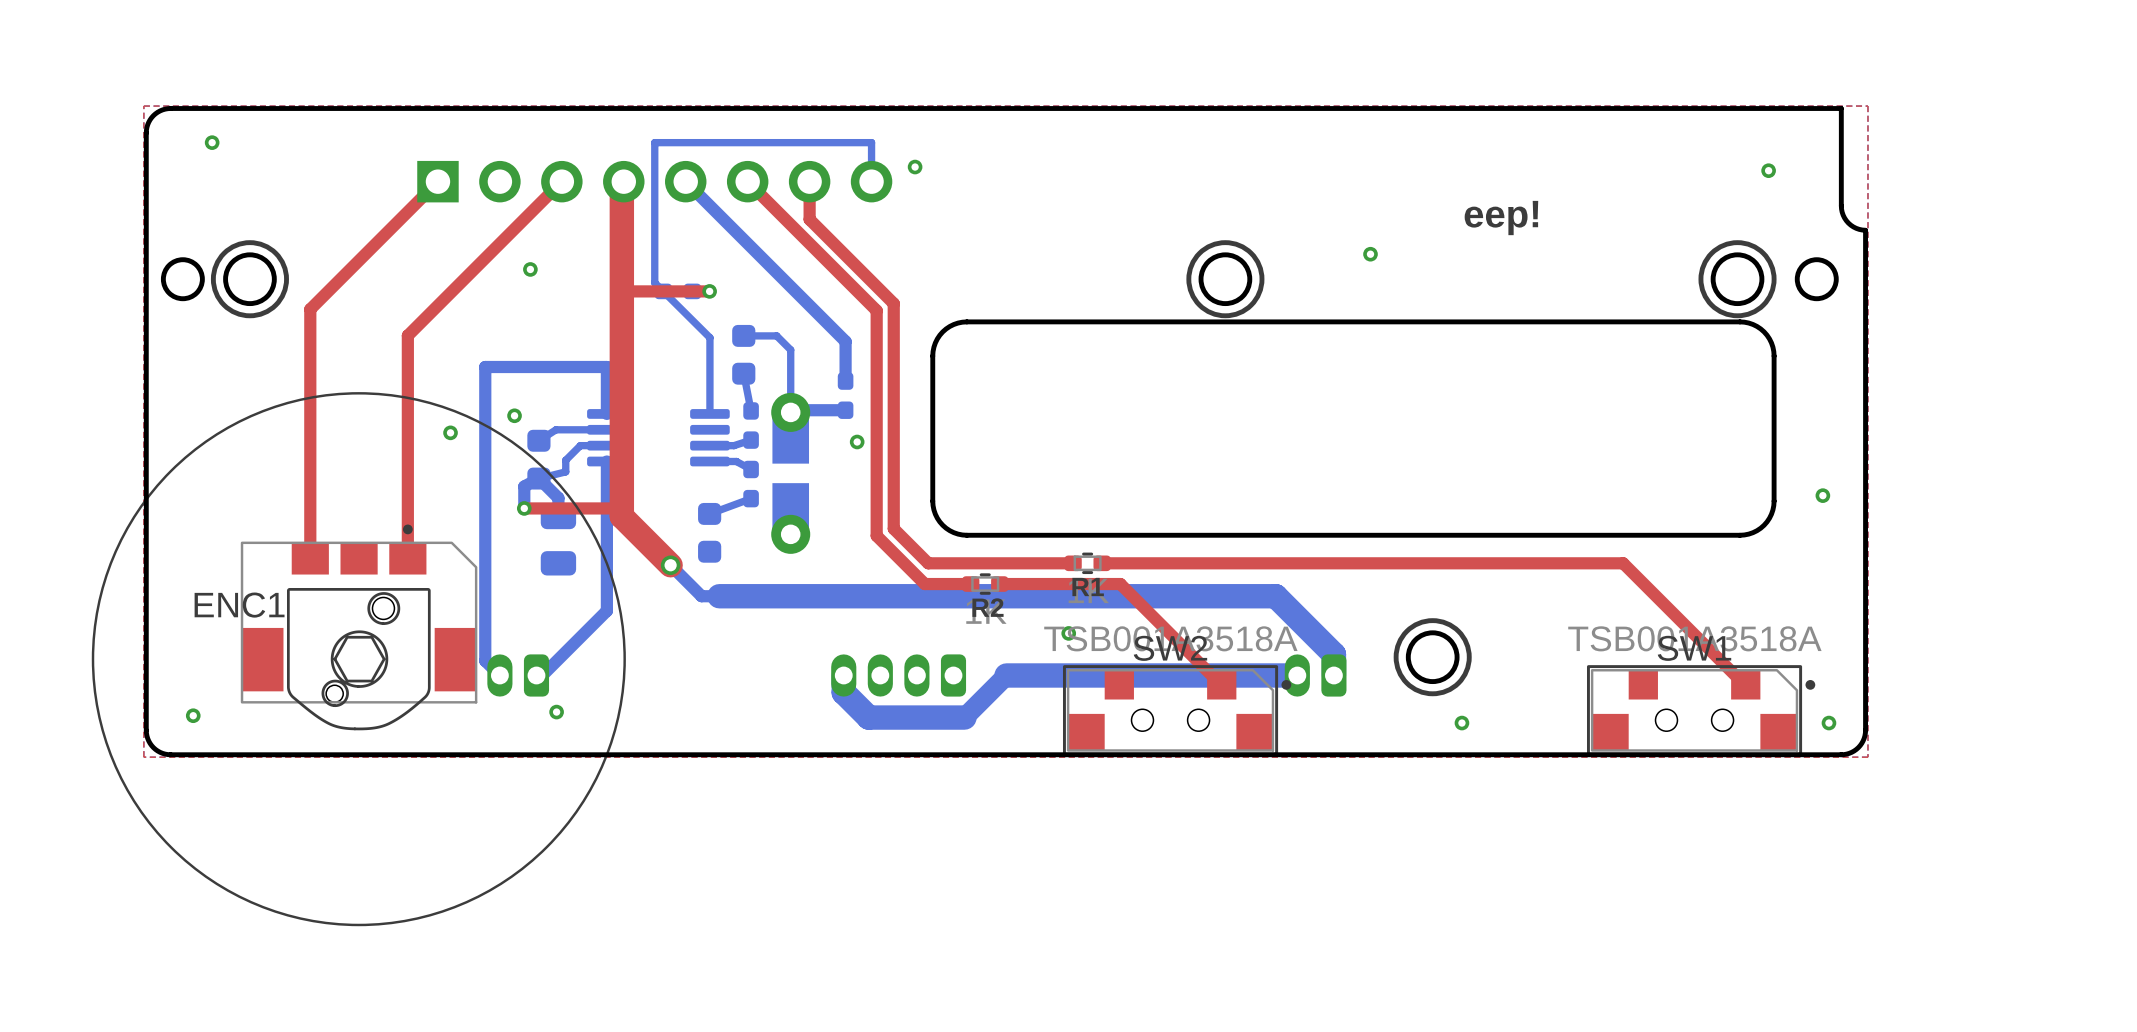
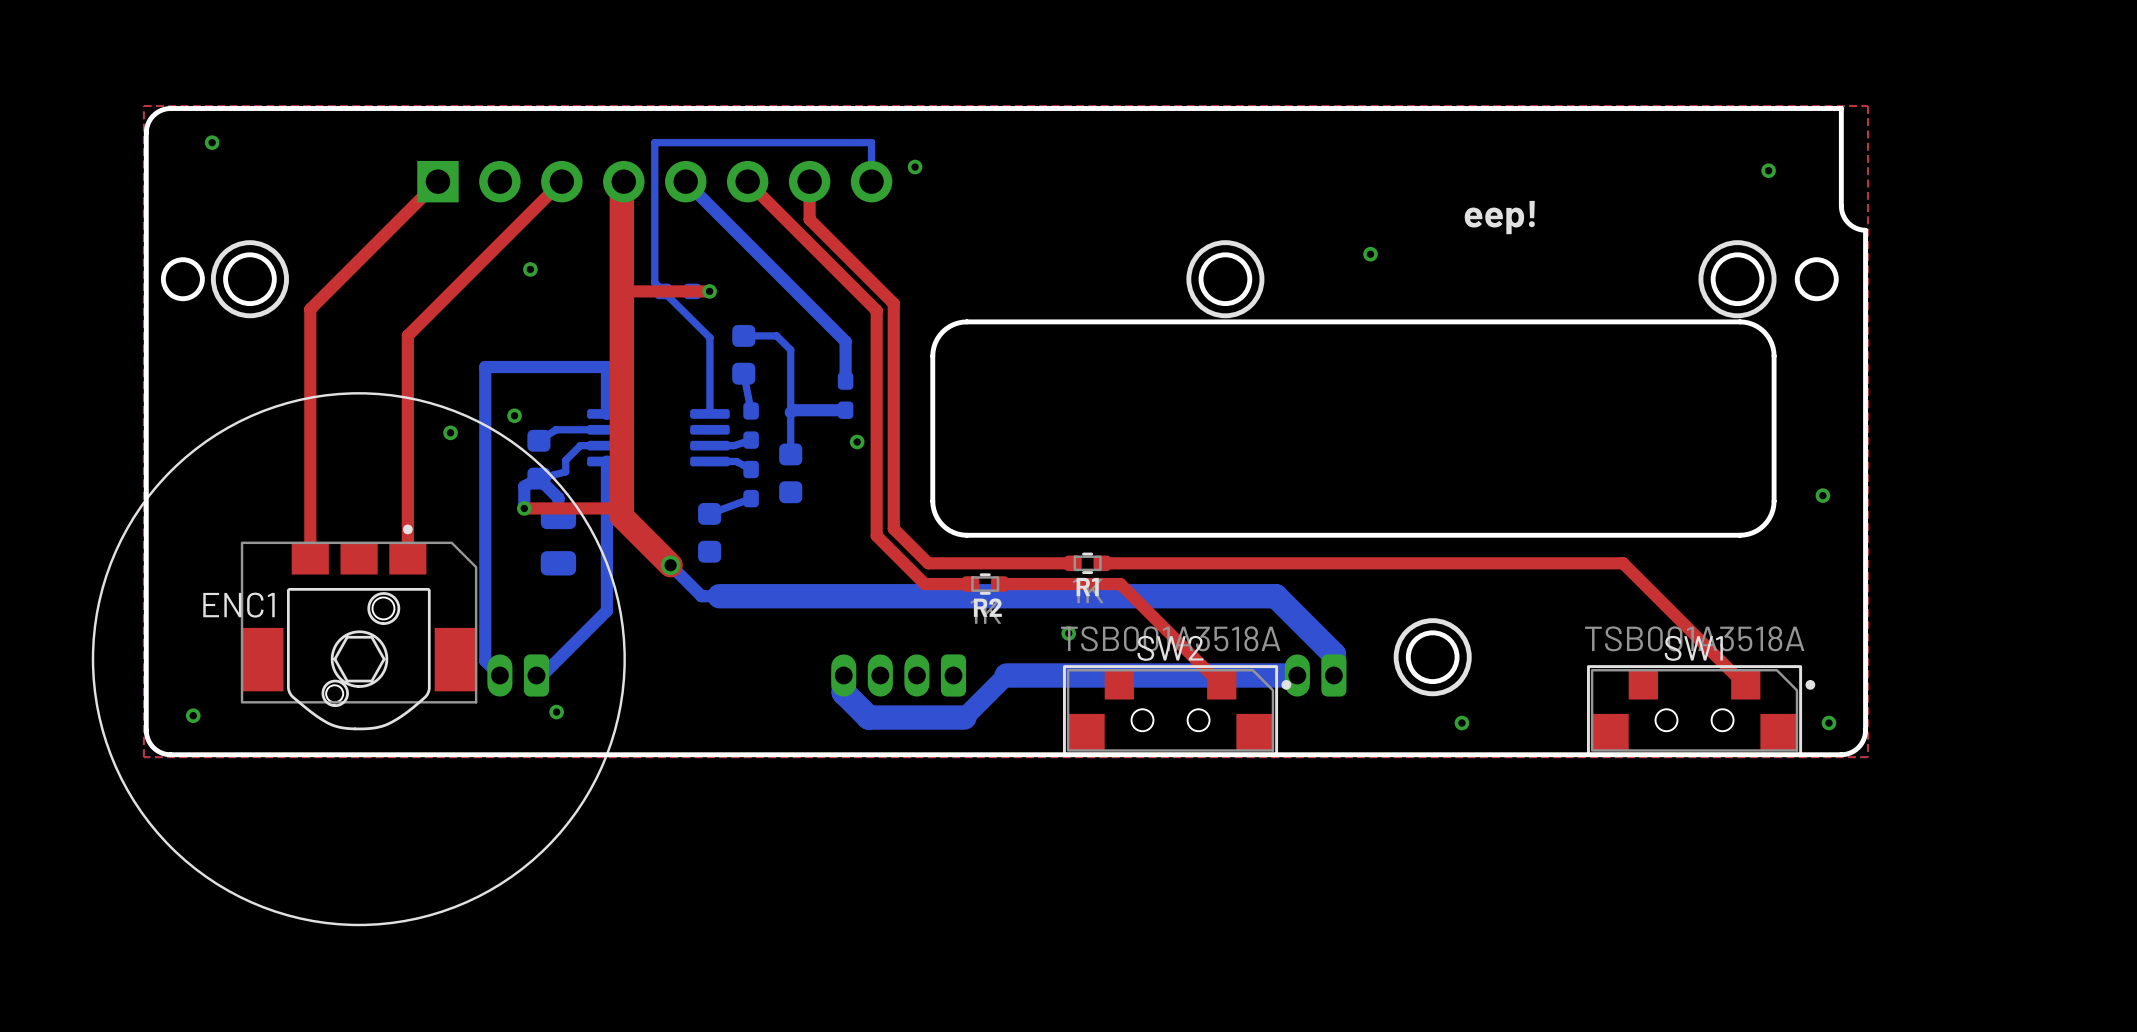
part footprint: [771, 392, 811, 554] -> [779, 443, 803, 504]
bottom track: none -> (790, 412) (790, 454)

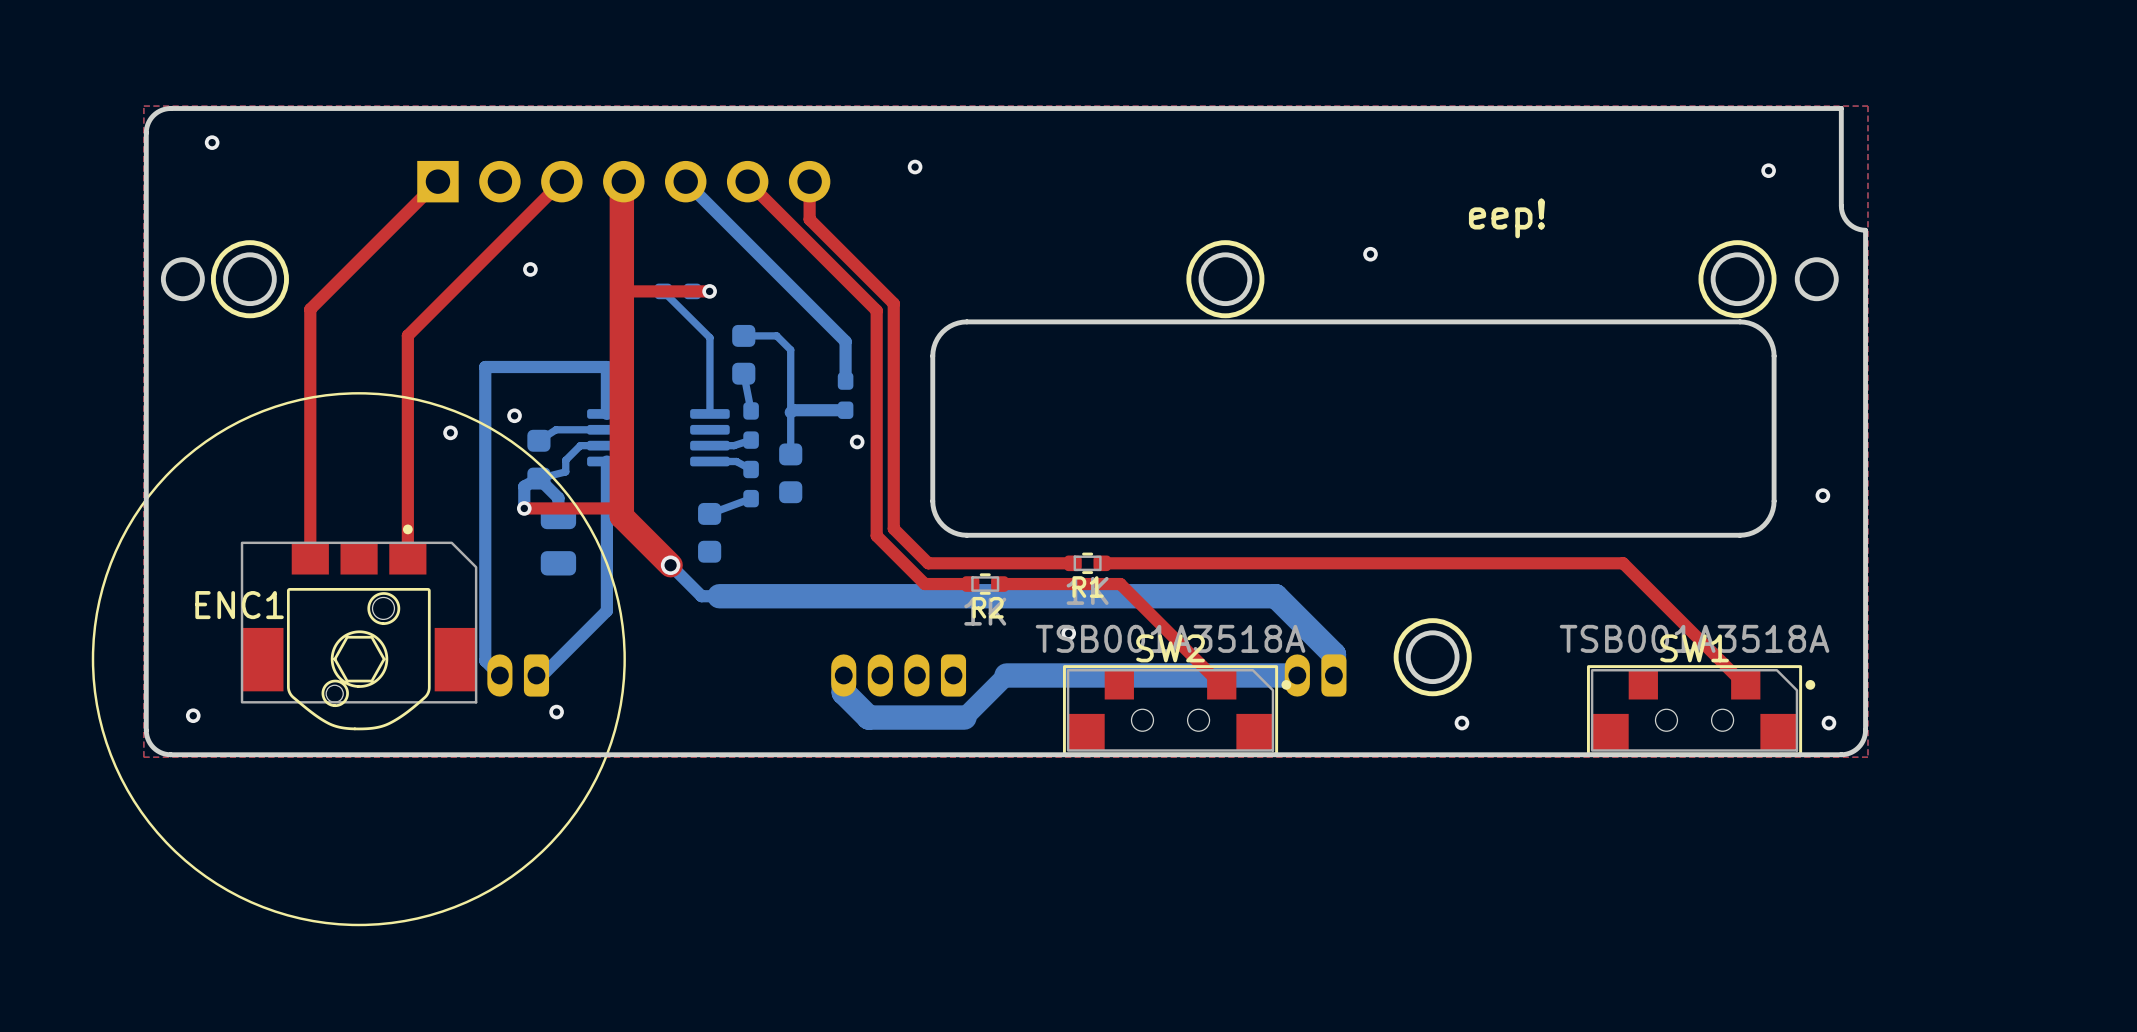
part: (654, 181) -> none
bottom track: (871, 181) (871, 142) (654, 142) (654, 282) (663, 291) -> none

